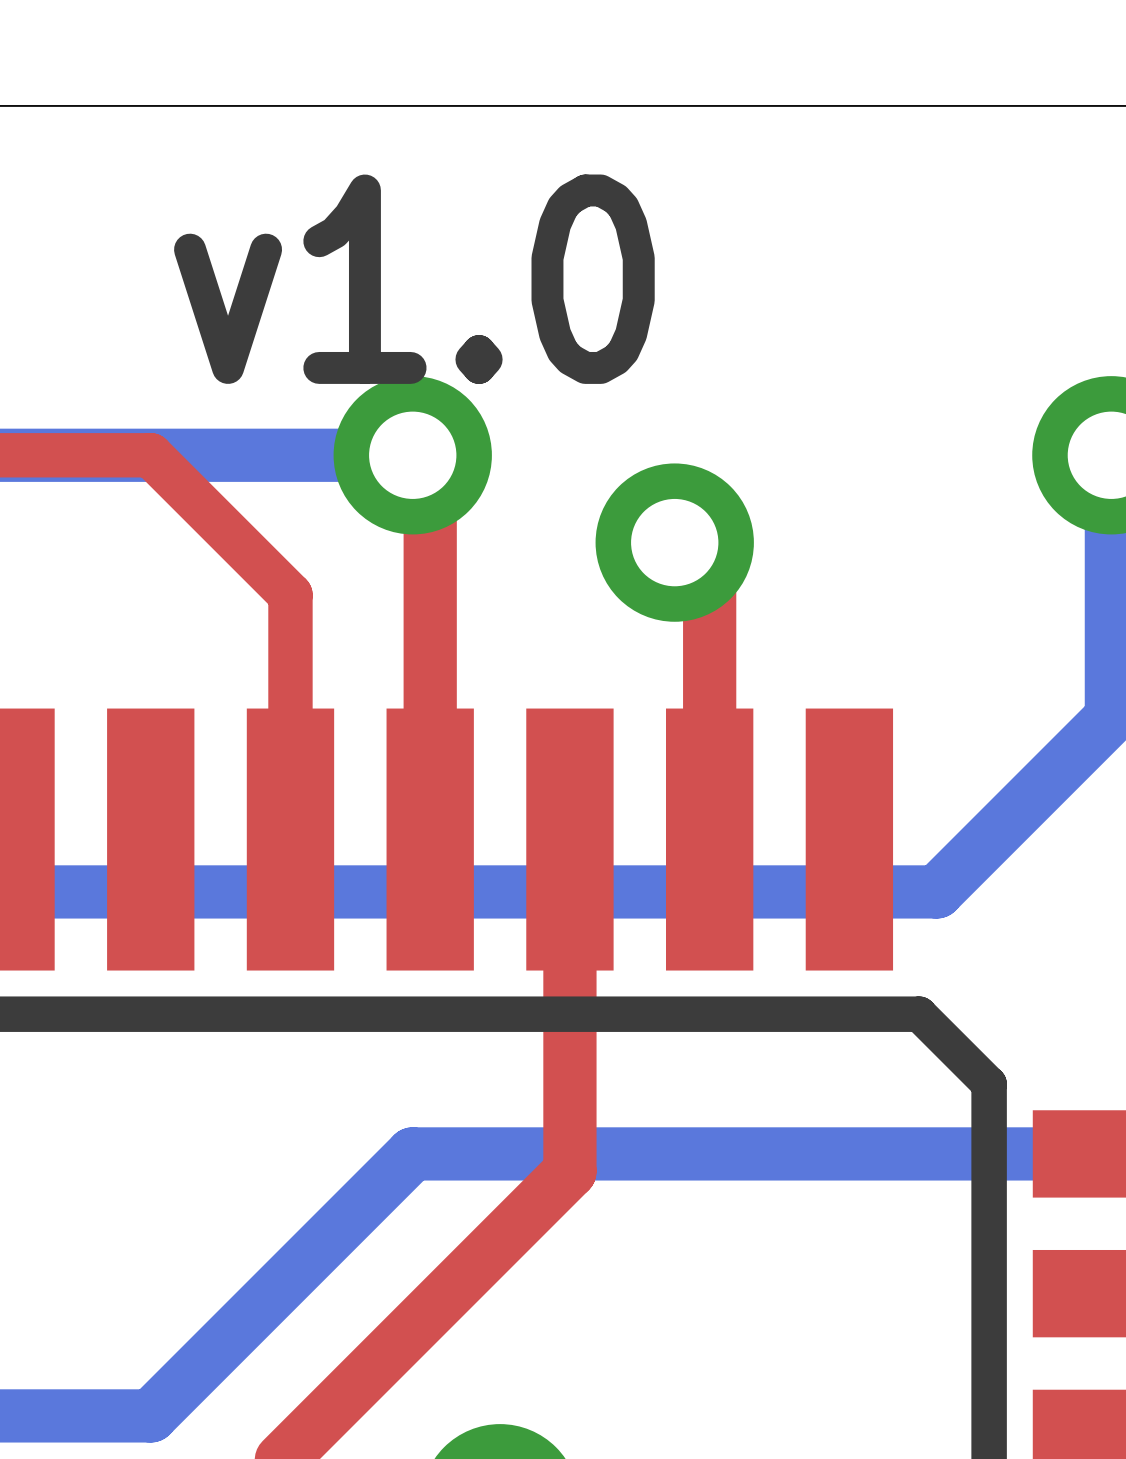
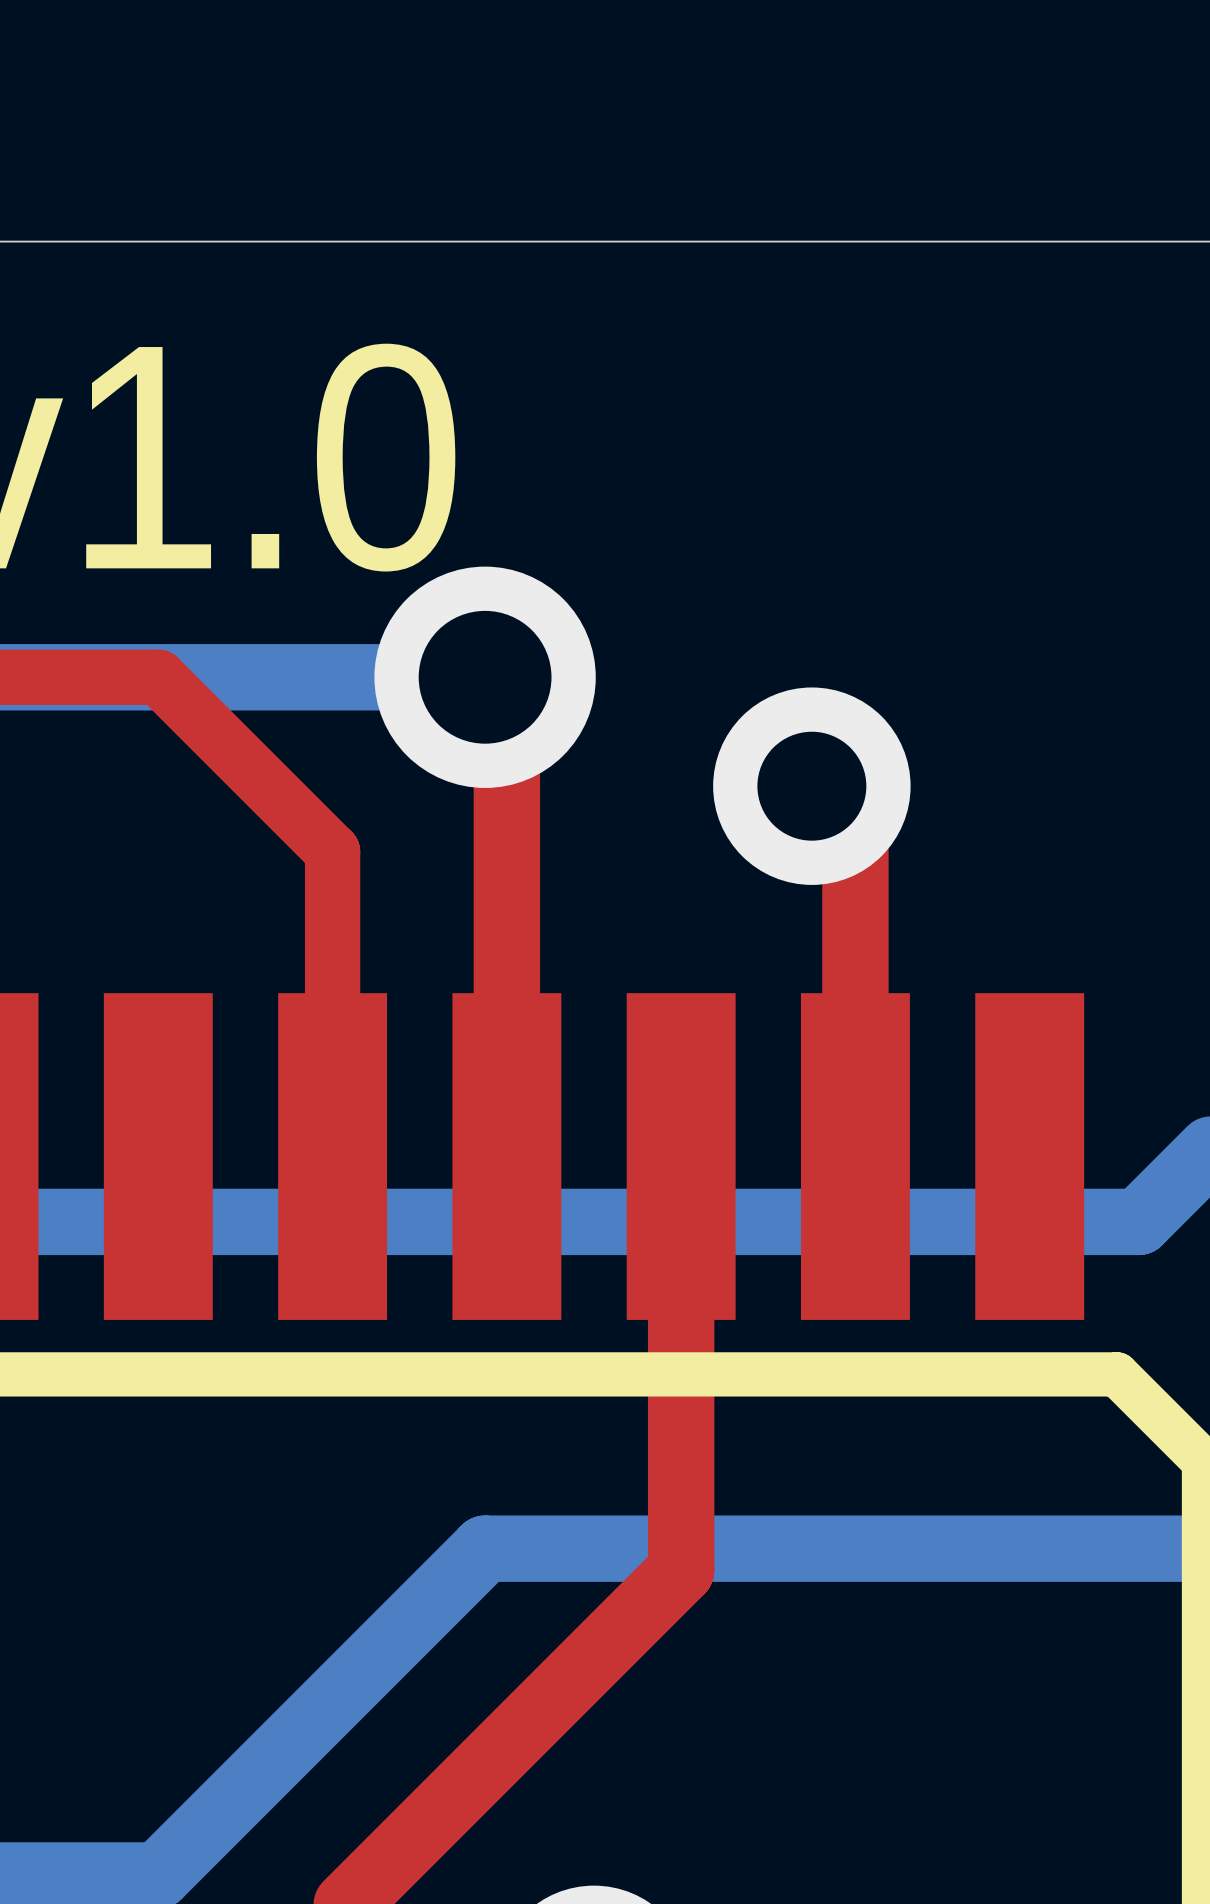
via size: [333, 376, 492, 535] -> [374, 566, 596, 788]

